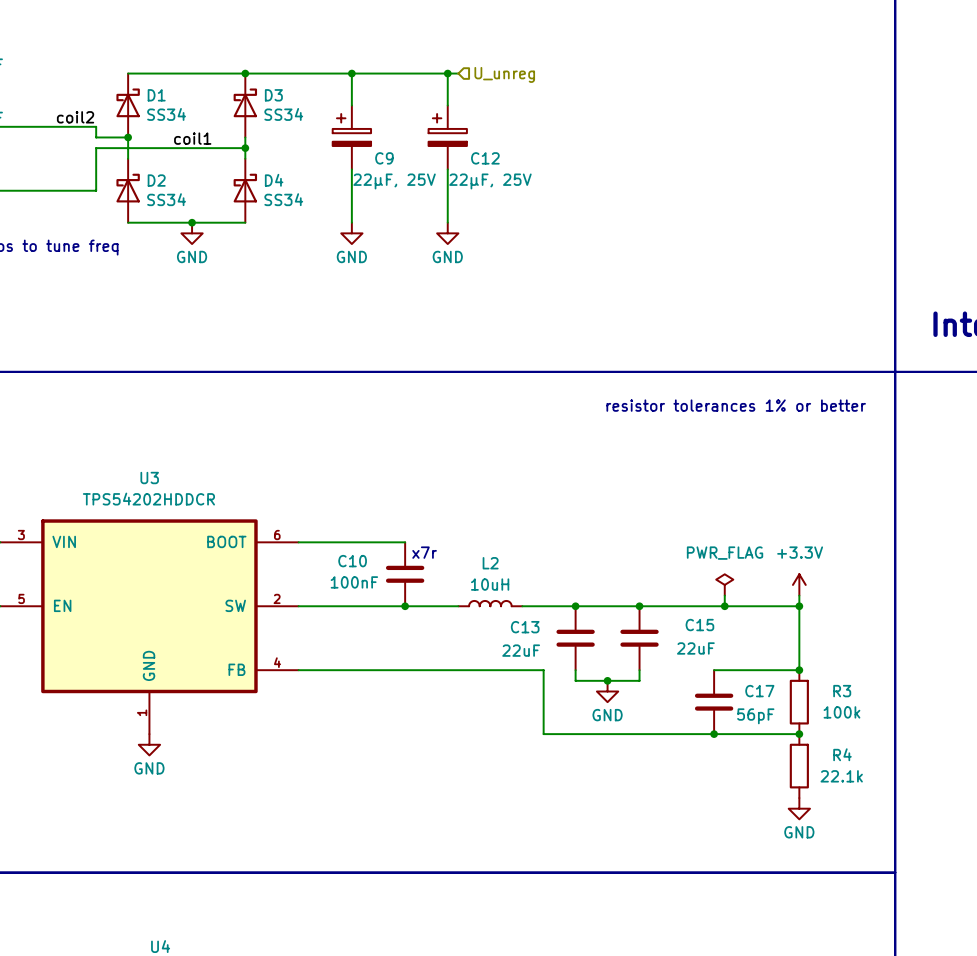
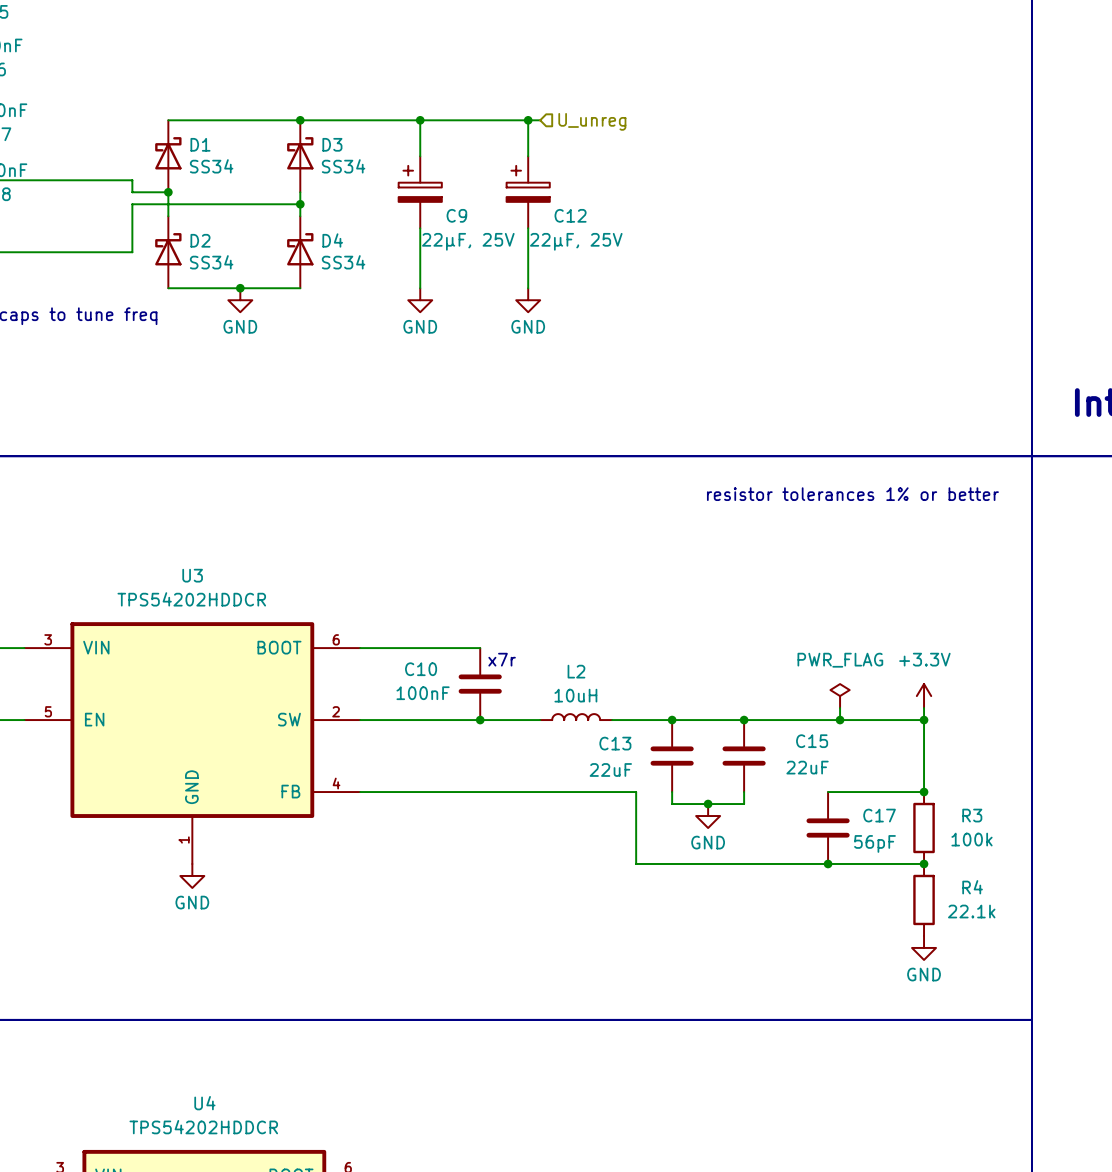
label: coil2 (75, 117) -> none
label: coil1 (192, 138) -> none

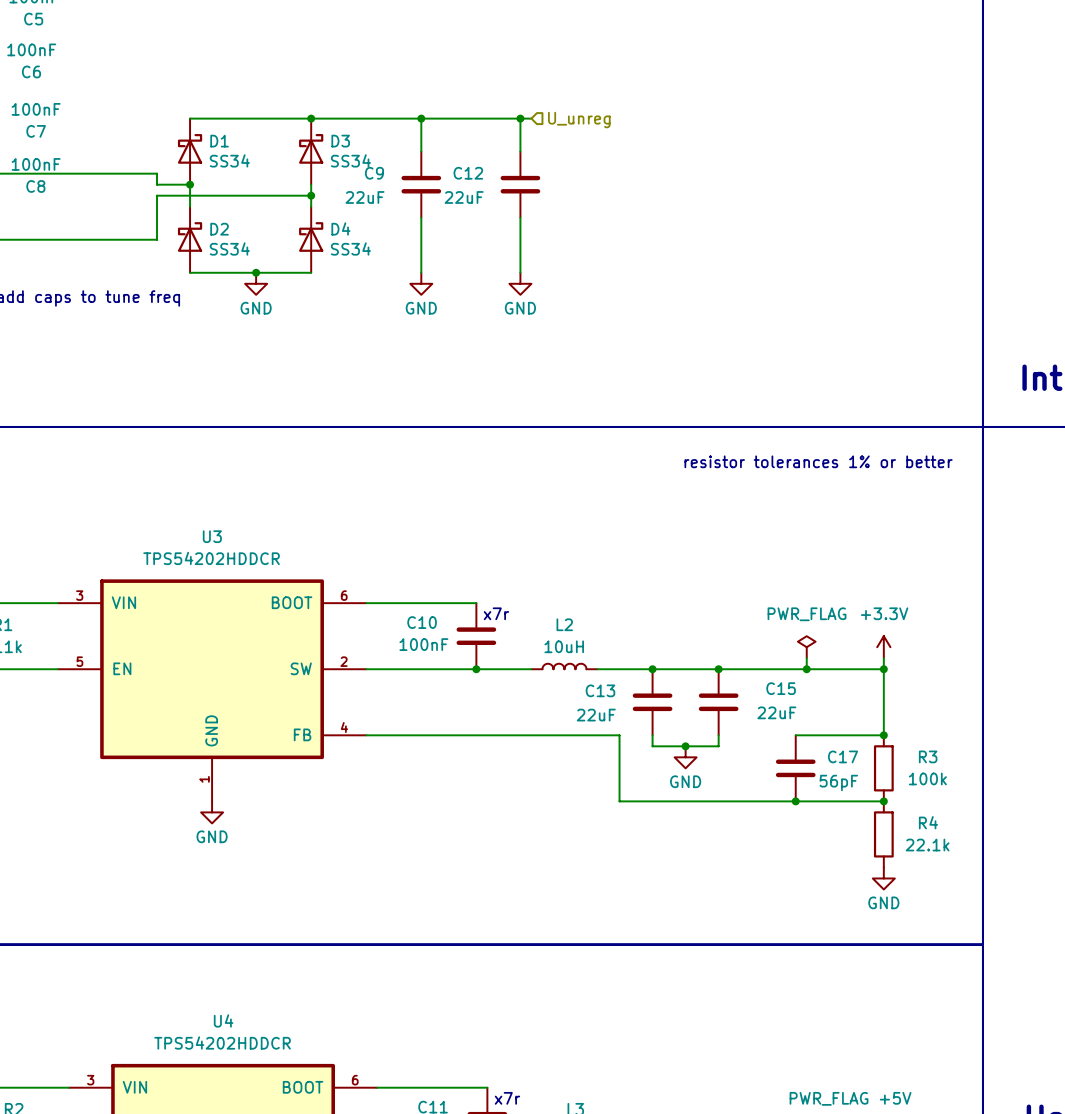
C9 symbol: [398, 156, 442, 229] -> [401, 151, 442, 218]
C12 symbol: [506, 156, 550, 229] -> [500, 151, 541, 218]
C9 name position: C9 (456, 215) -> C9 (374, 173)
C12 name position: C12 (570, 215) -> C12 (468, 173)
C9 value: 22µF, 25V (468, 241) -> 22uF (365, 197)
C12 value: 22µF, 25V (576, 241) -> 22uF (464, 197)

